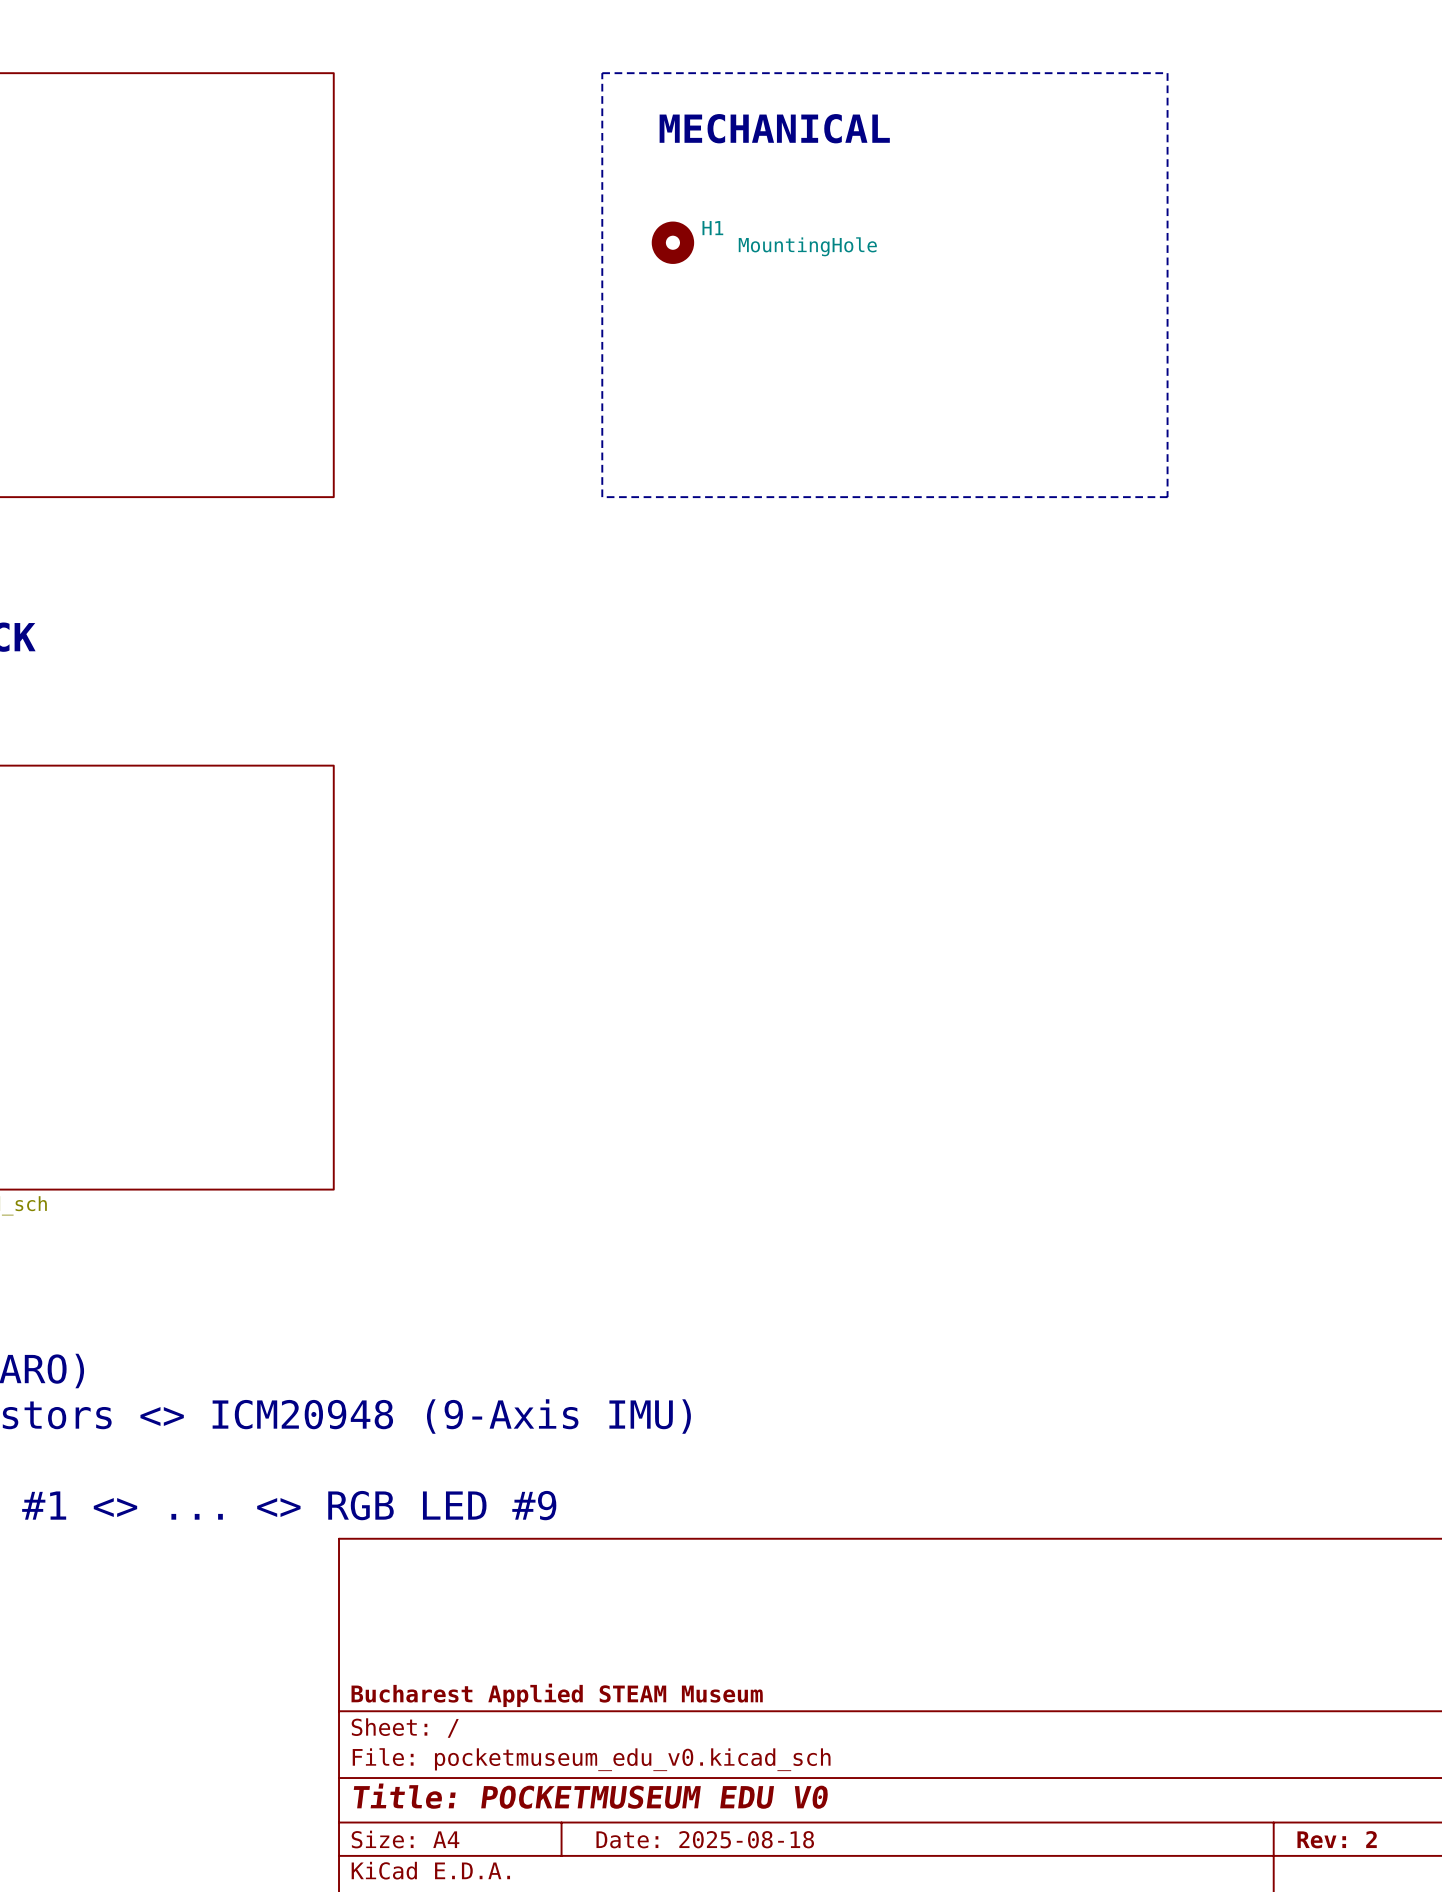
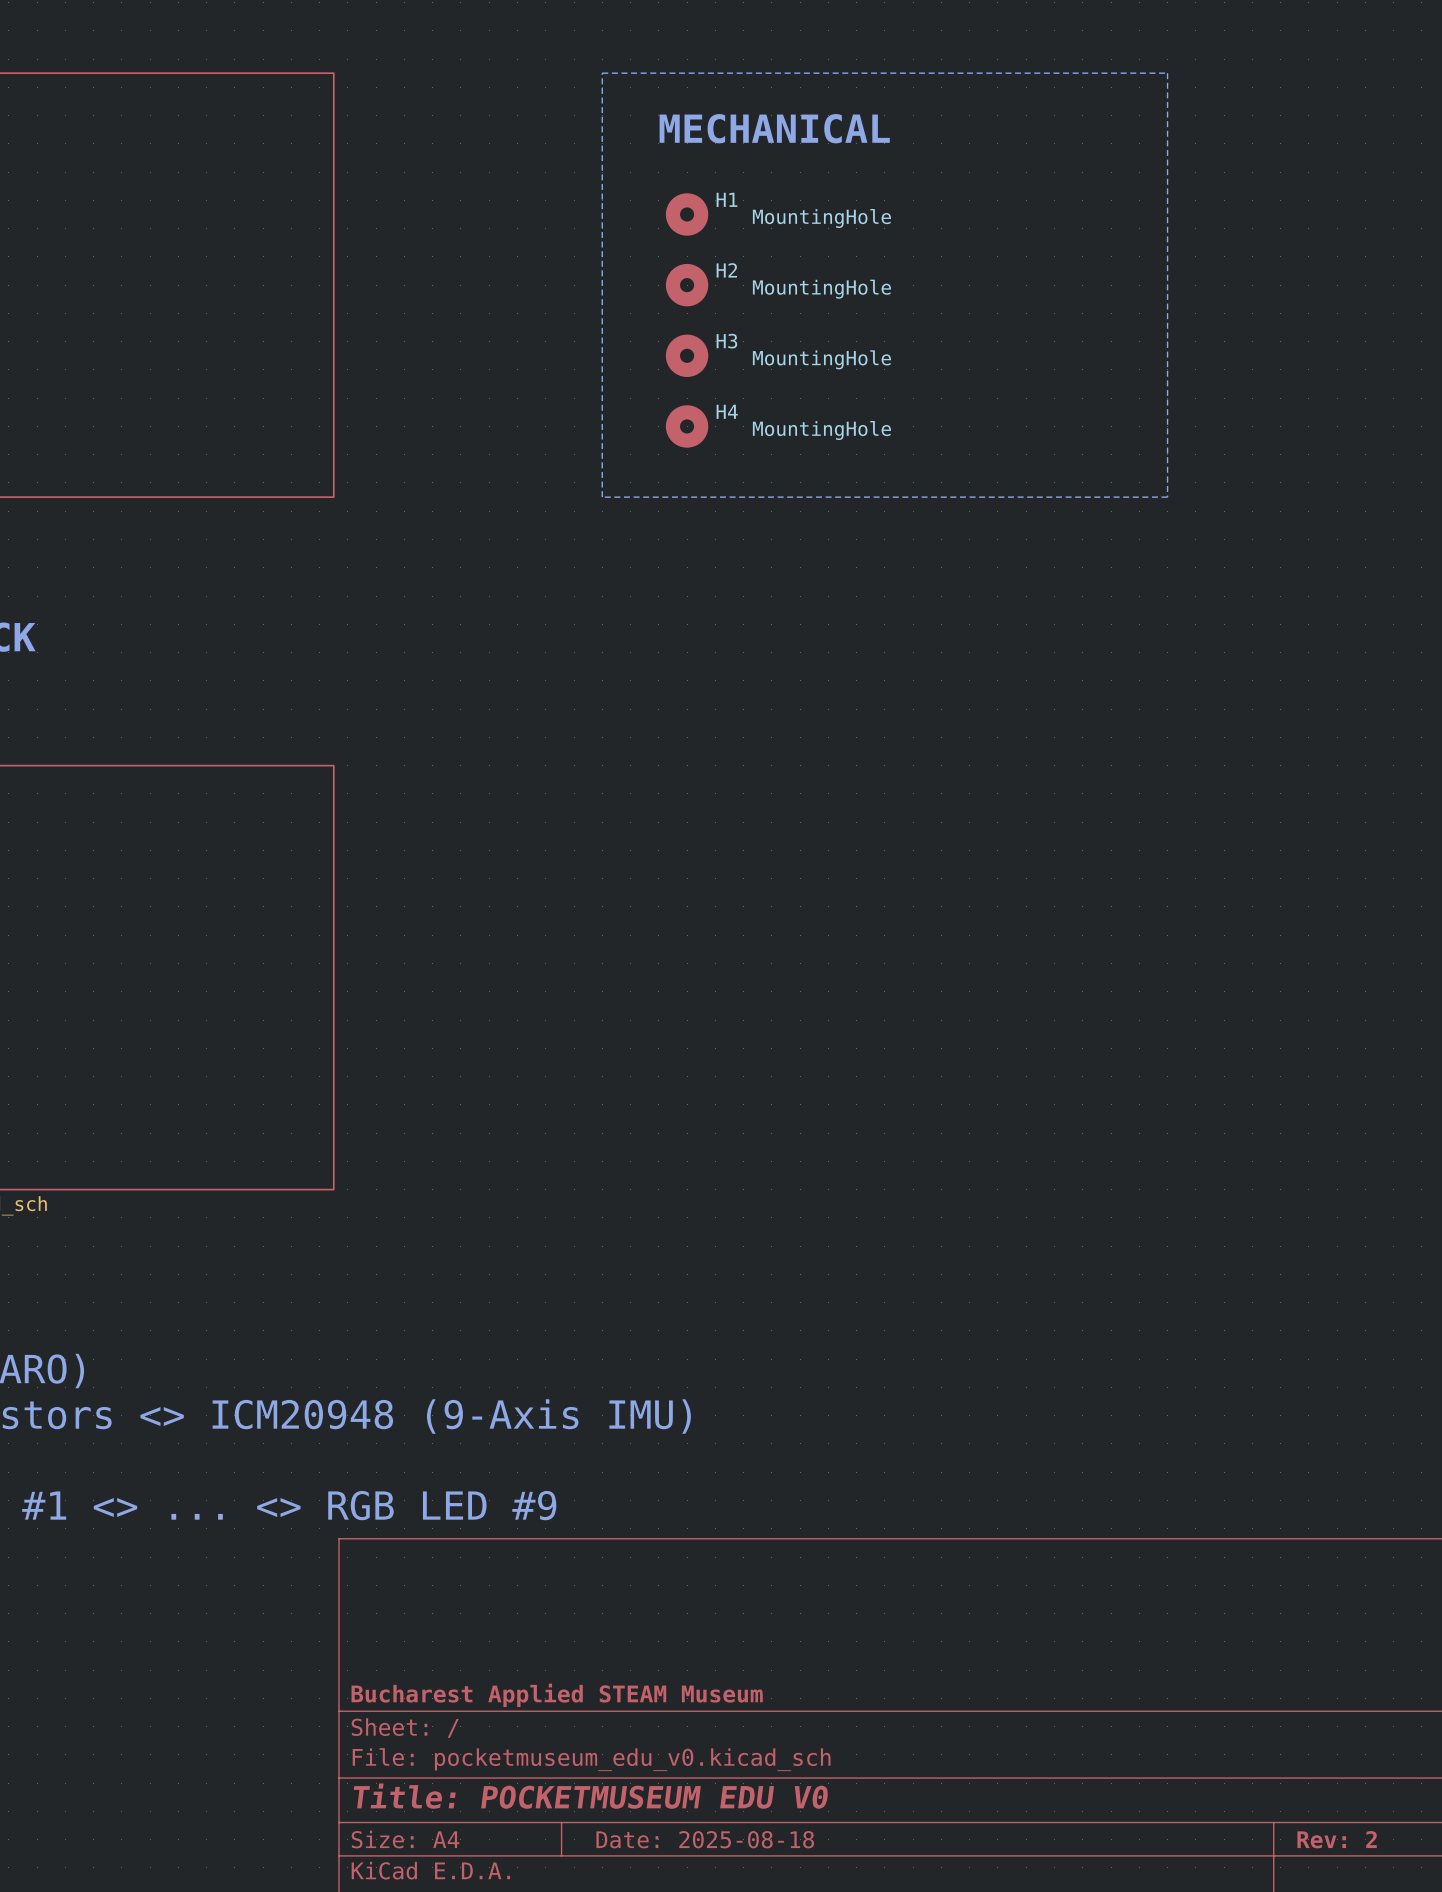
H1 position: (672, 242) -> (687, 214)
H2: none -> MountingHole (687, 285)
H3: none -> MountingHole (687, 355)
H4: none -> MountingHole (687, 426)

